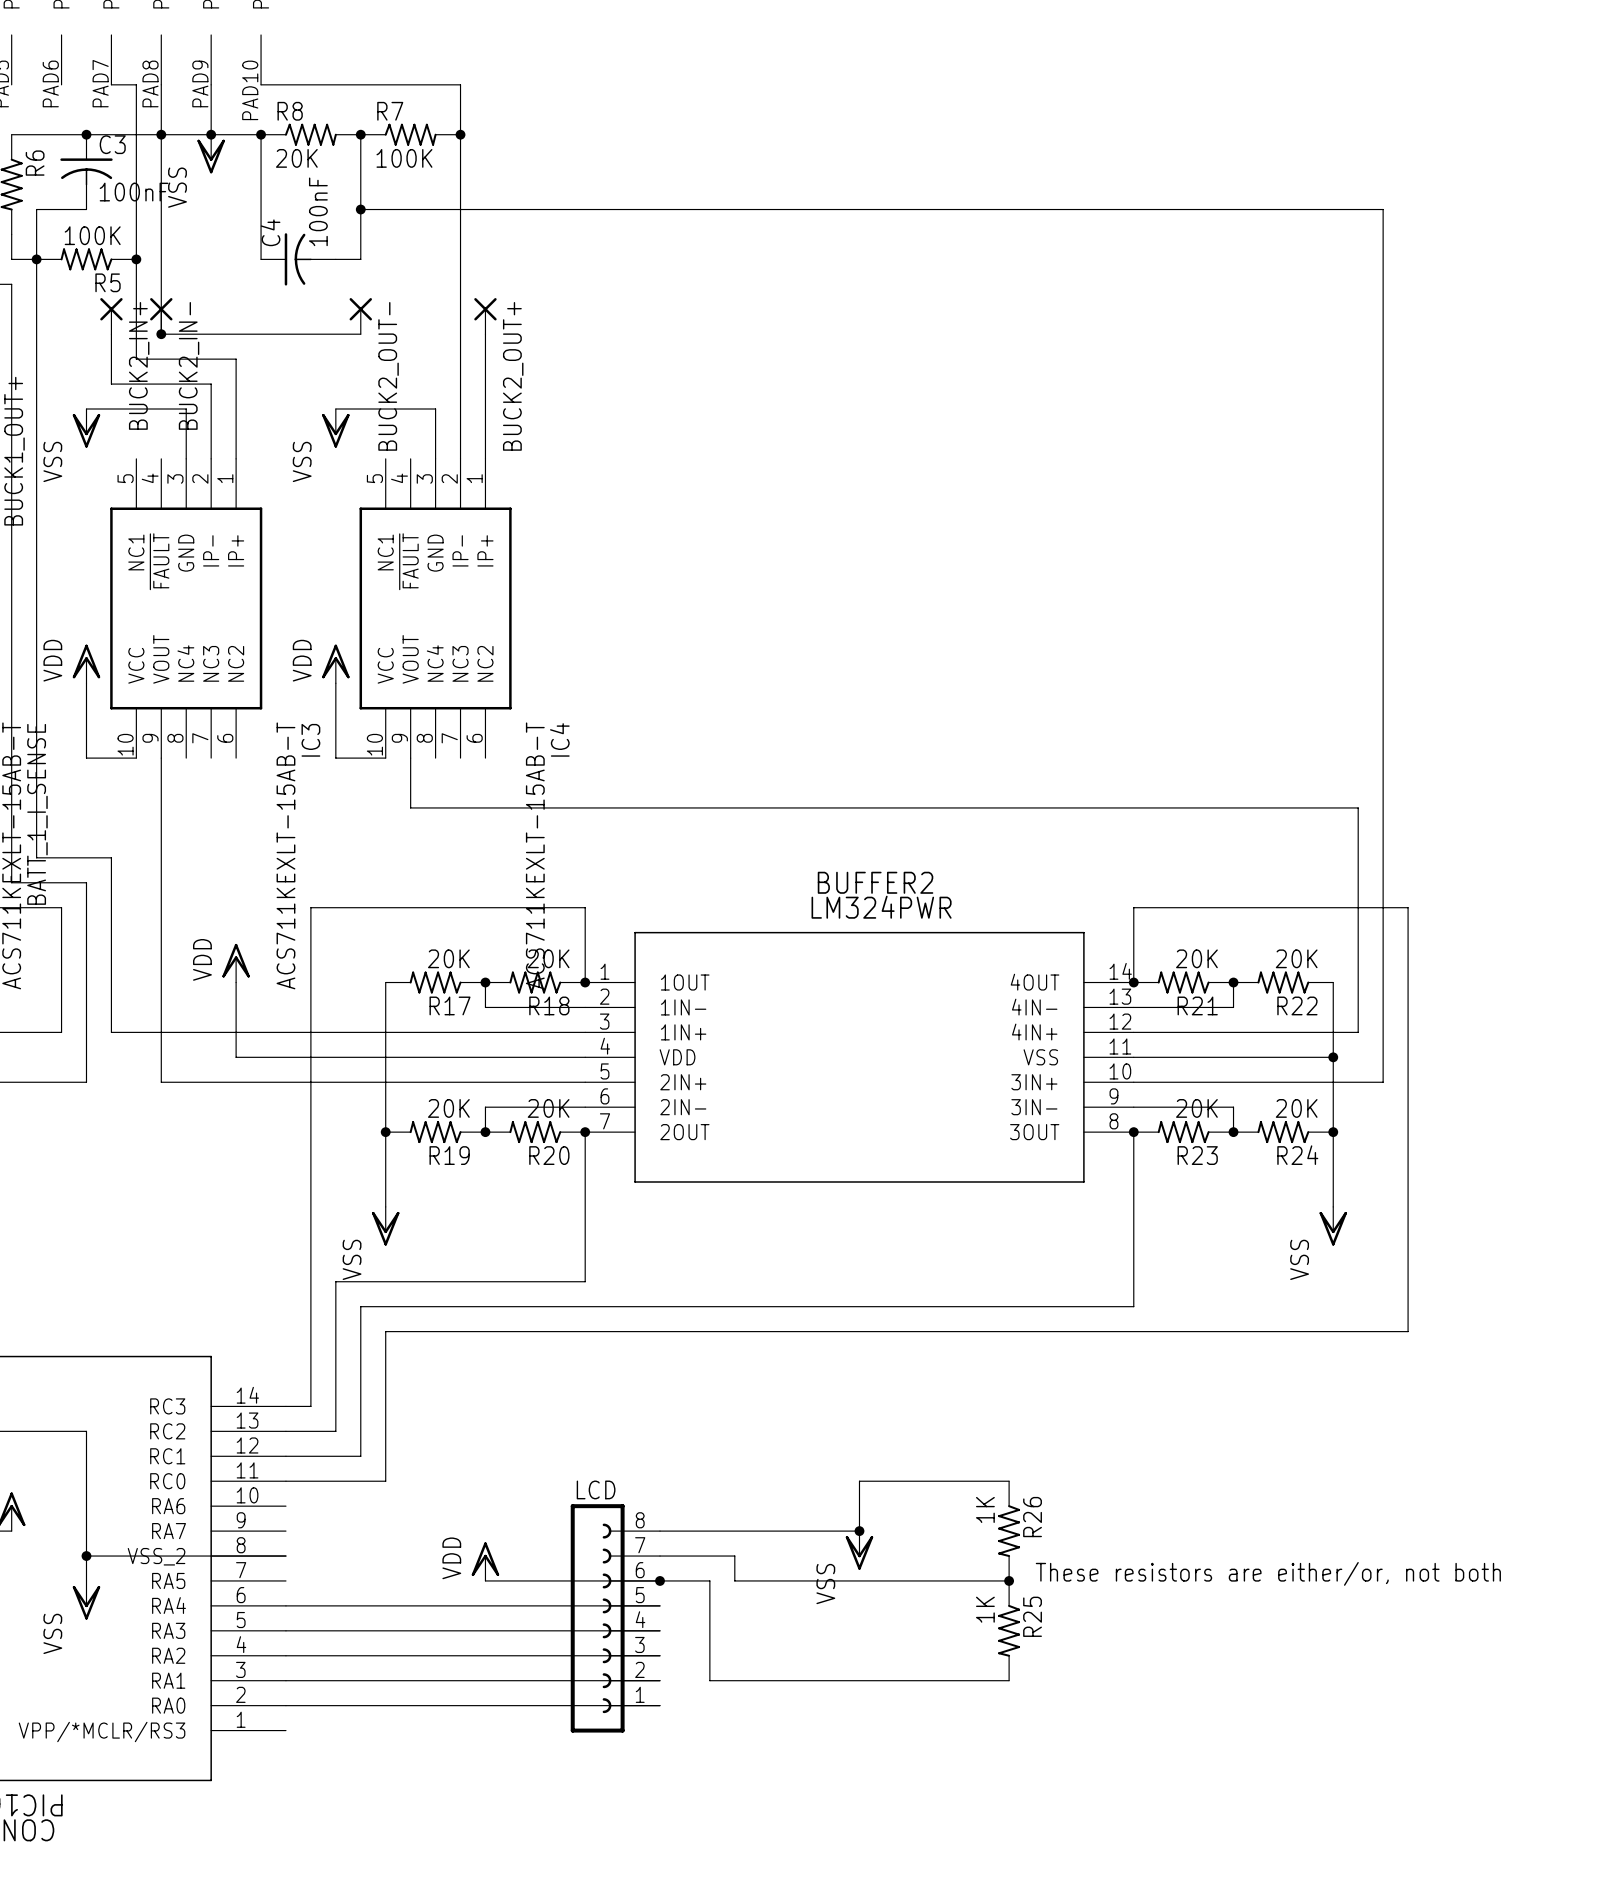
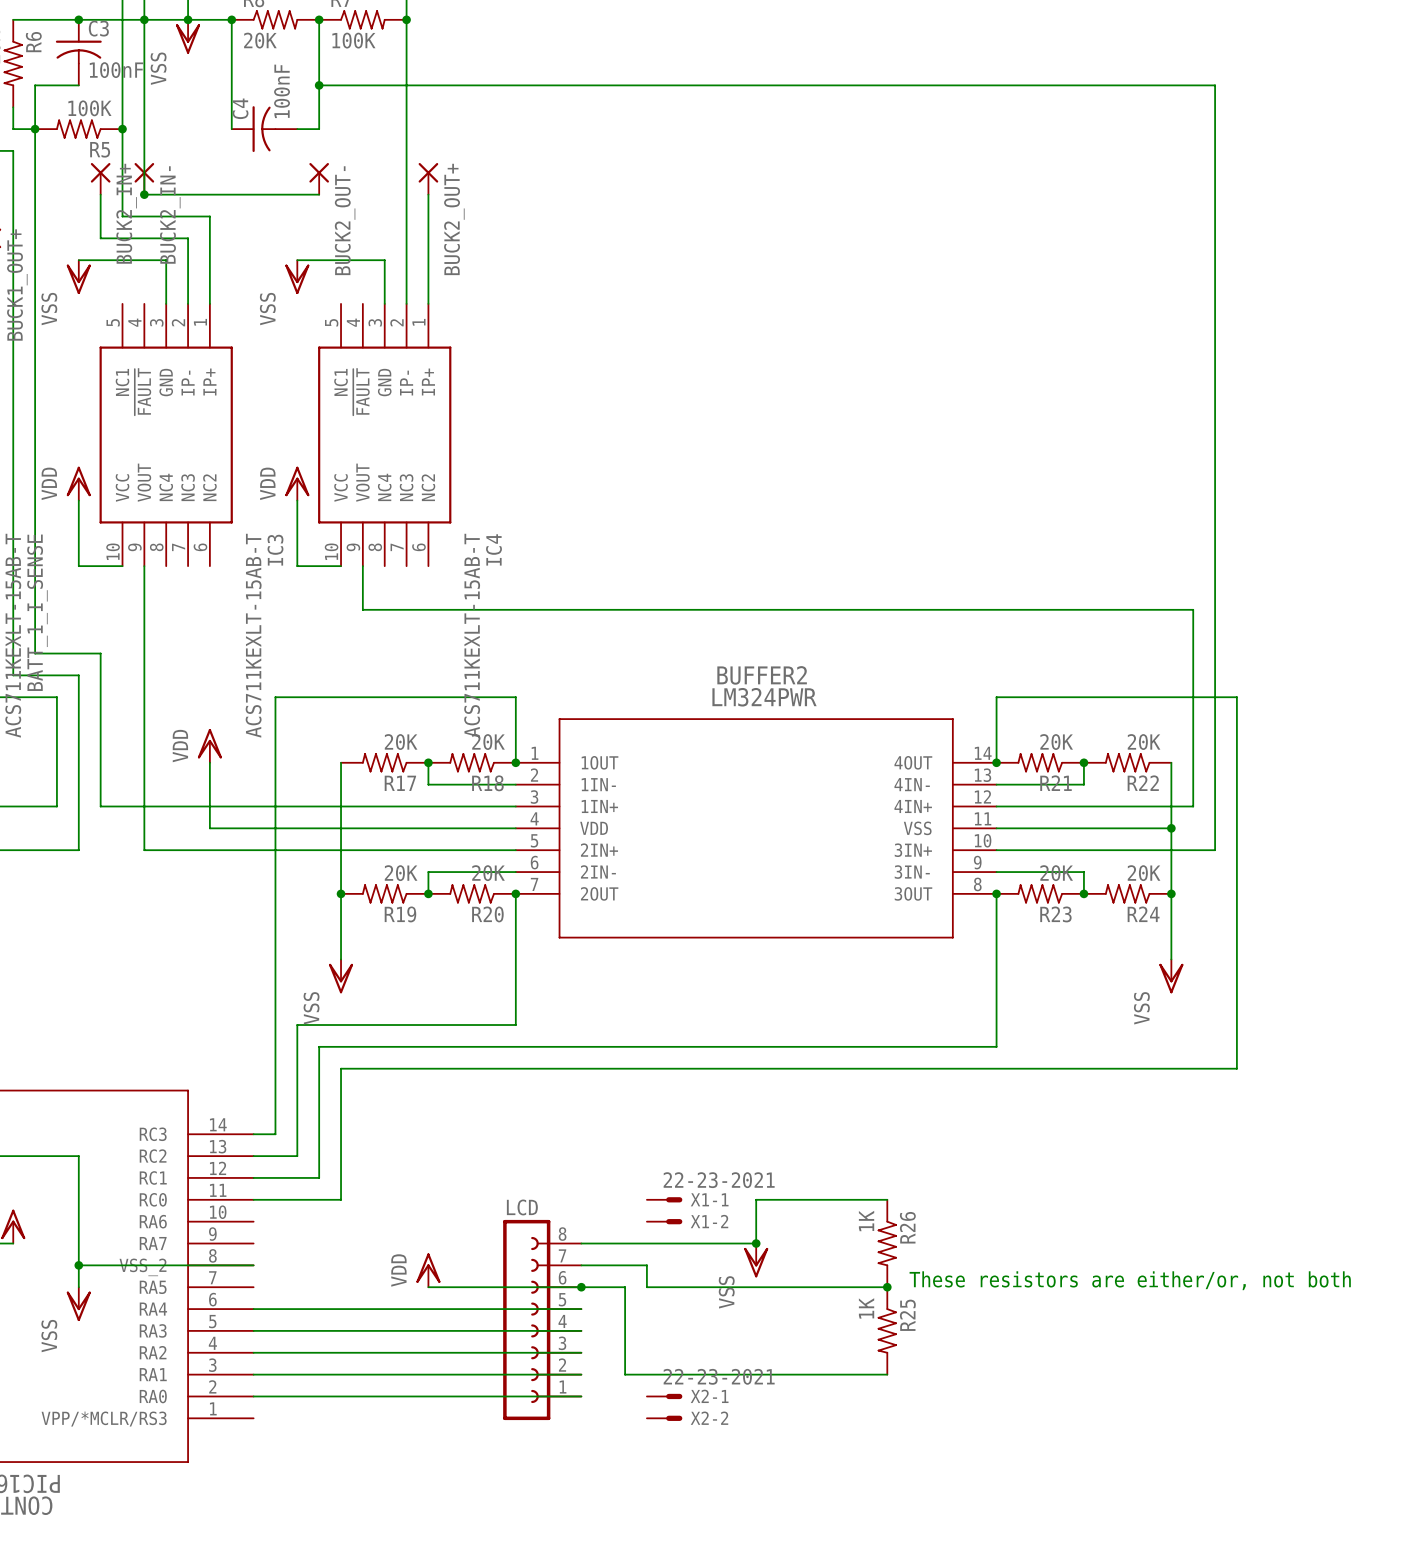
X1-1: none -> 22-23-2021 (664, 1199)
X1-2: none -> (664, 1221)
X2-1: none -> 22-23-2021 (664, 1396)
X2-2: none -> (664, 1418)

